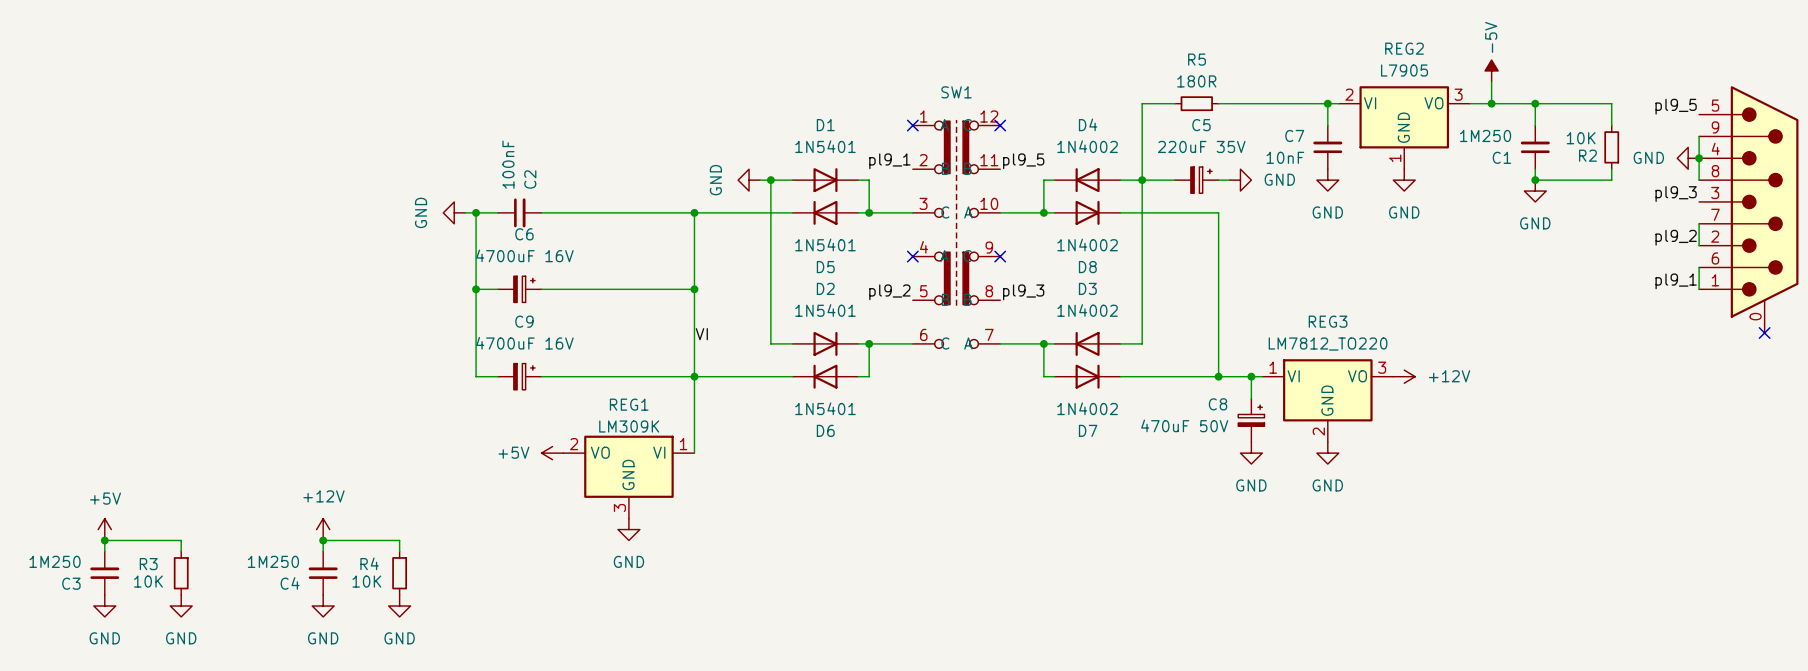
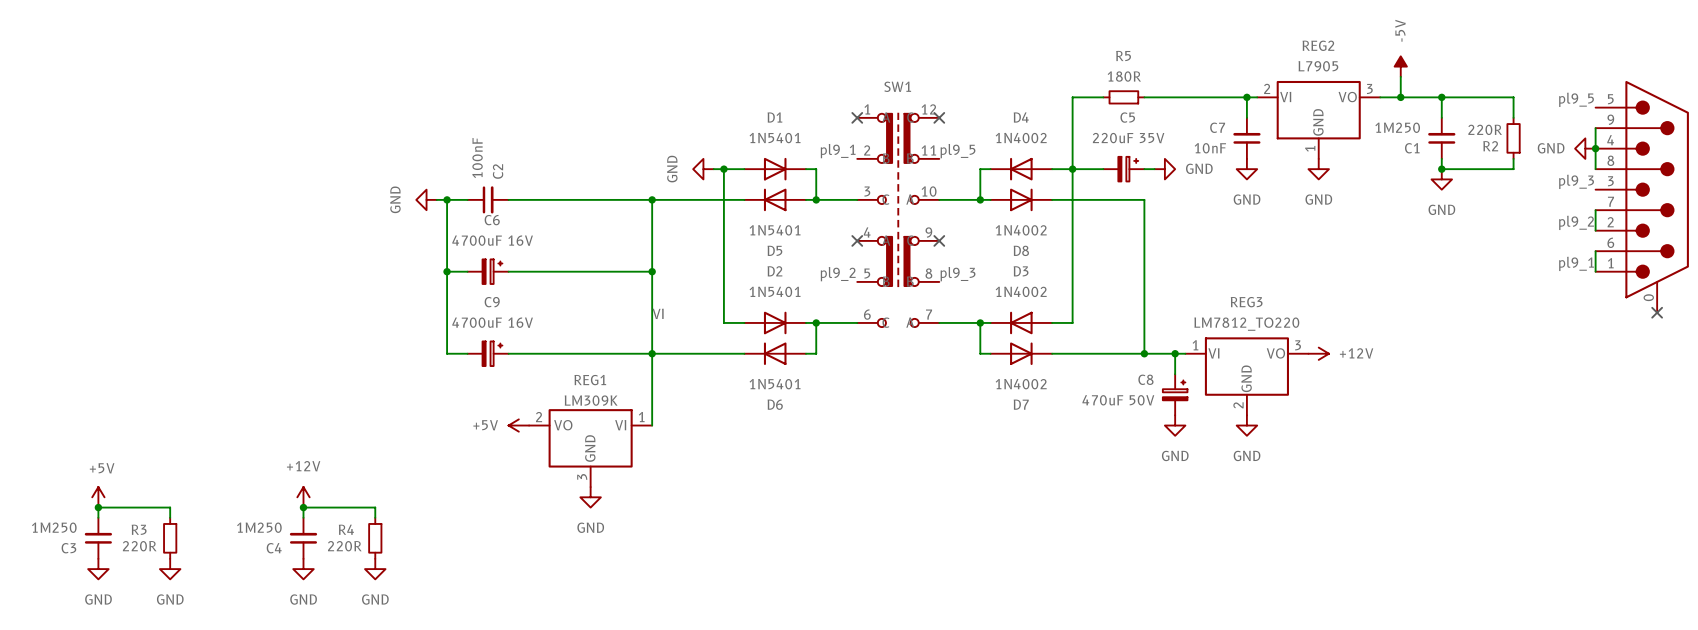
R2 value: 10K (1581, 138) -> 220R (1485, 129)
R3 value: 10K (148, 581) -> 220R (139, 546)
R4 value: 10K (366, 581) -> 220R (344, 546)

